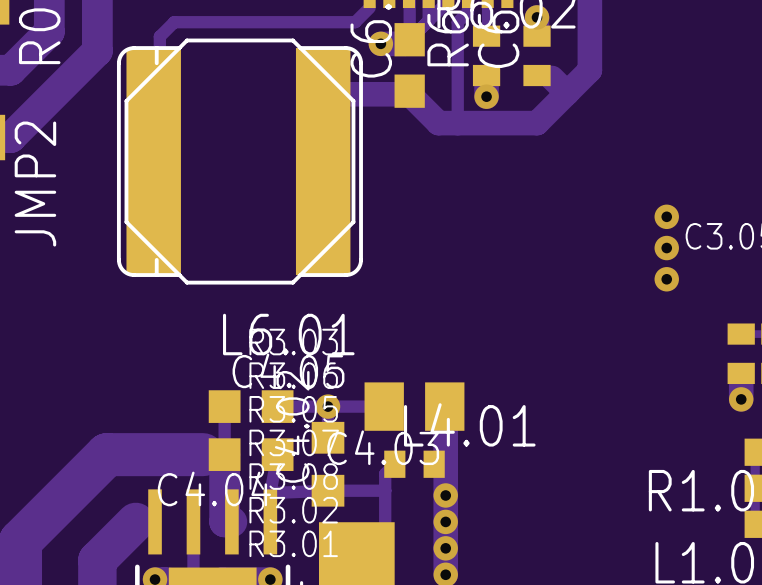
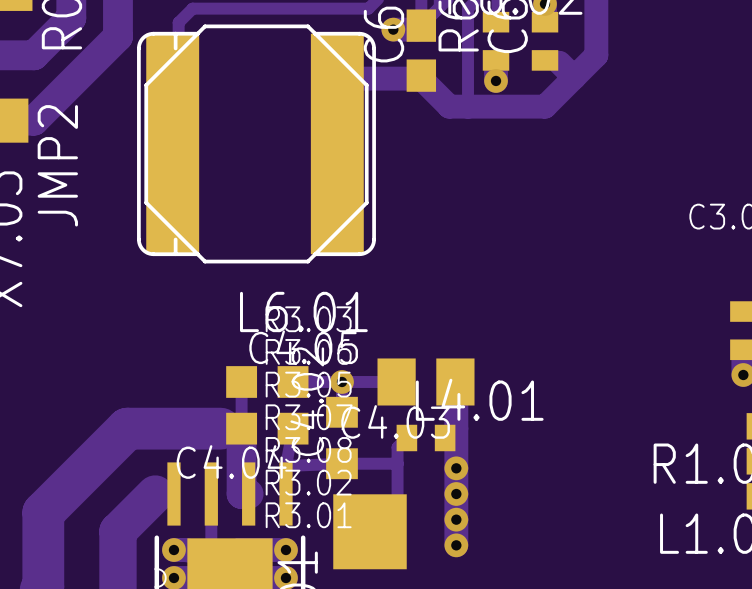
via: (666, 216) -> none
via: (666, 248) -> none
via: (666, 279) -> none

